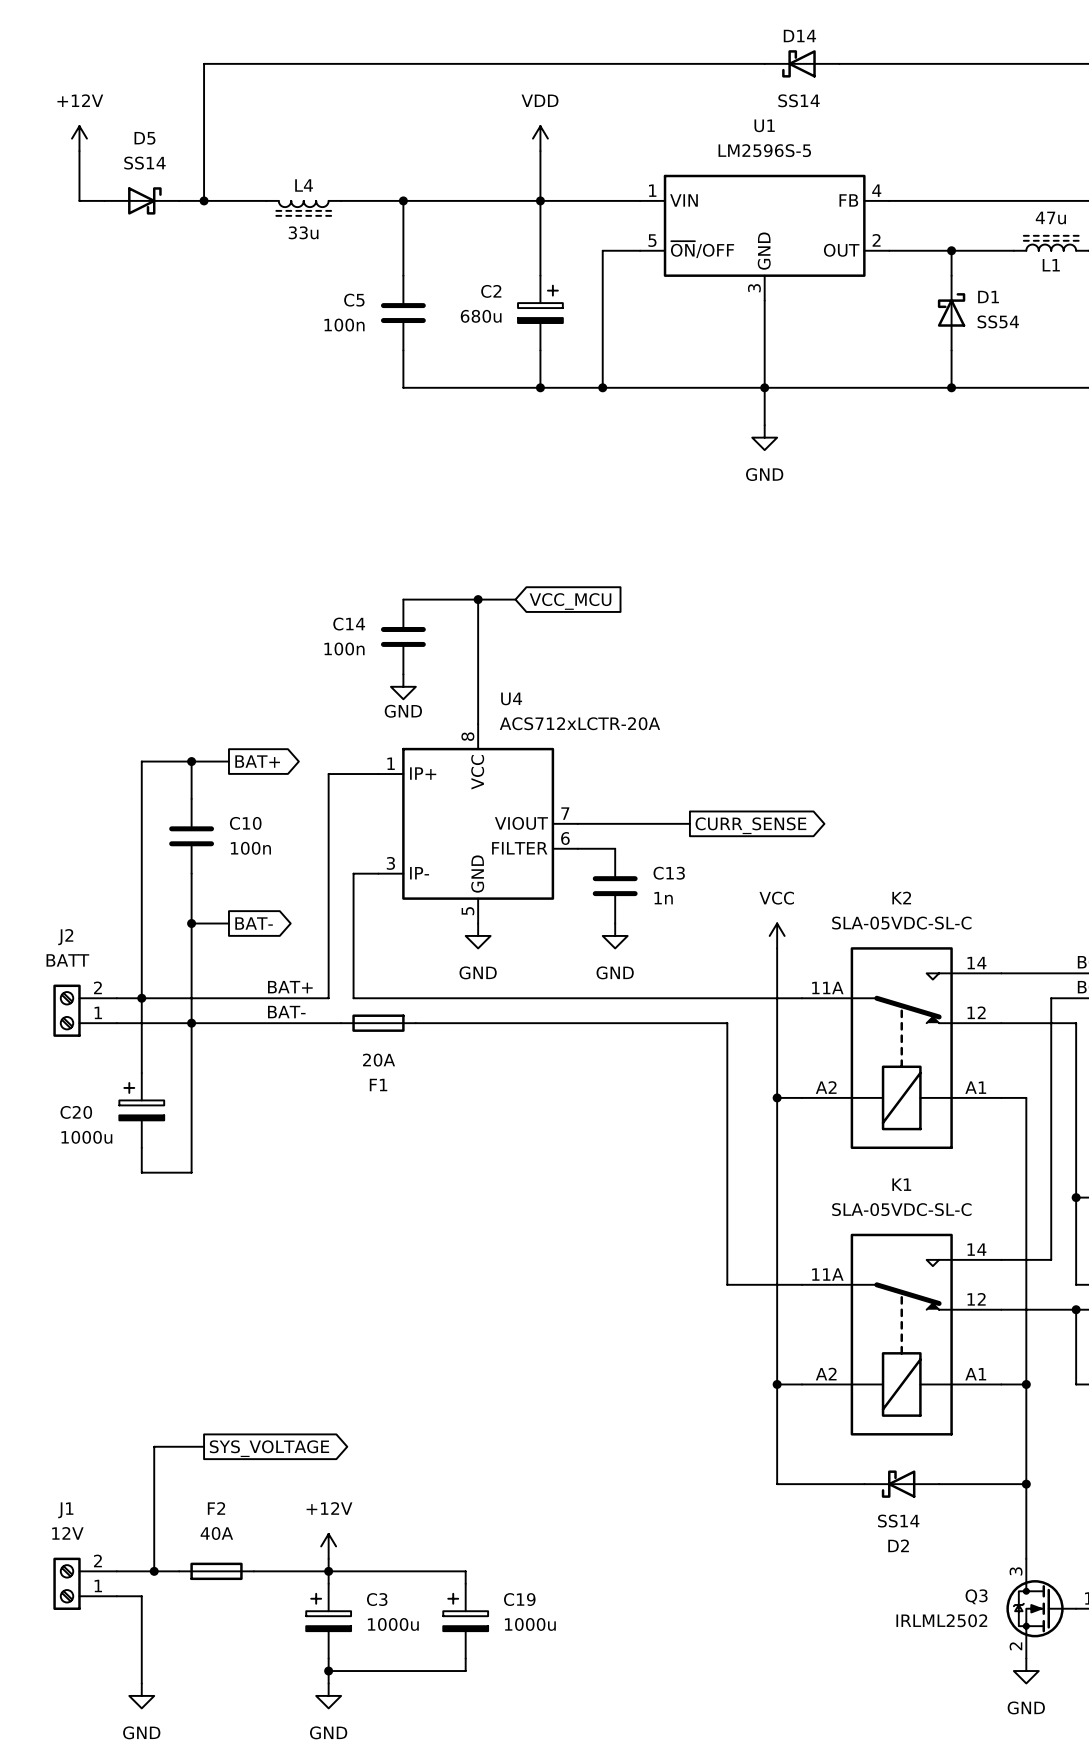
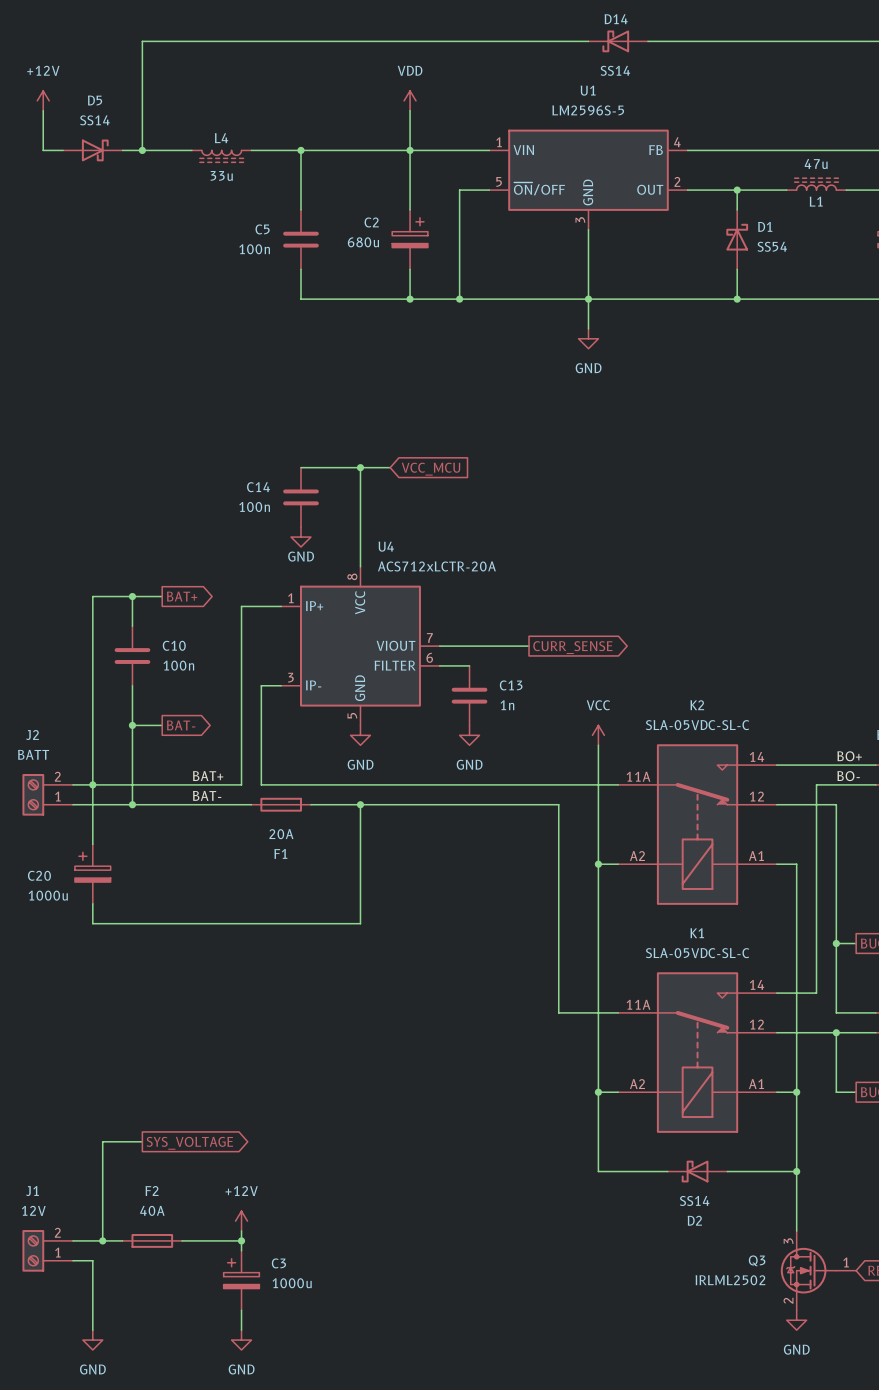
wire: (191, 1023) (191, 1172) -> (360, 804) (360, 923) (132, 923)
junction: none -> (360, 804)
wire: (328, 1571) (465, 1571) (465, 1583) -> none
C19: 1000u (465, 1621) -> none
wire: (465, 1658) (465, 1671) (328, 1671) -> none
junction: (328, 1671) -> none

